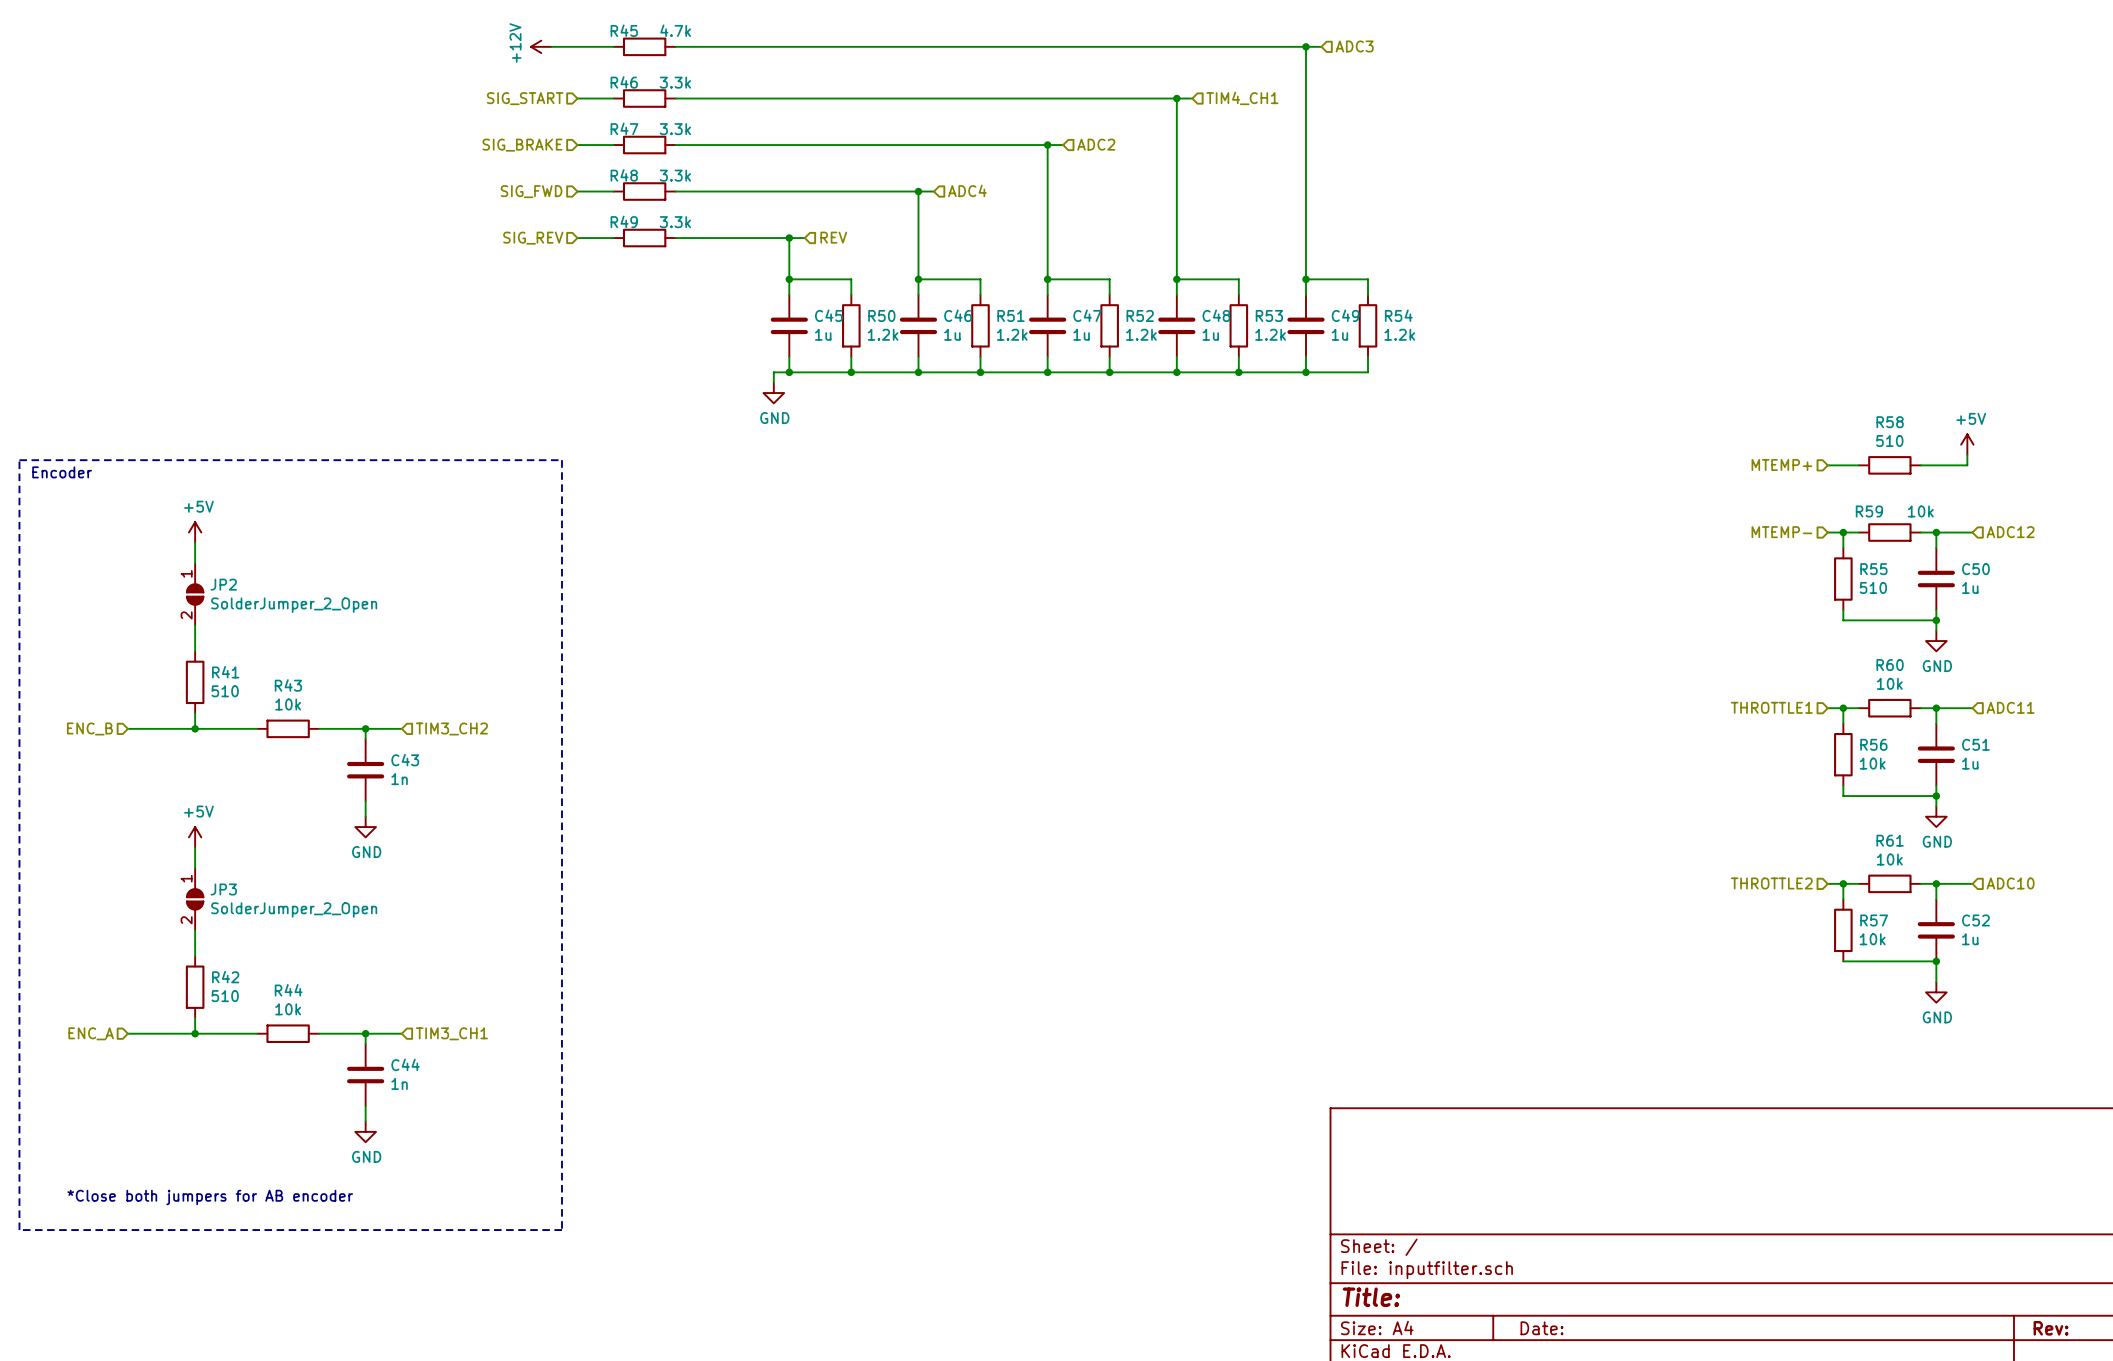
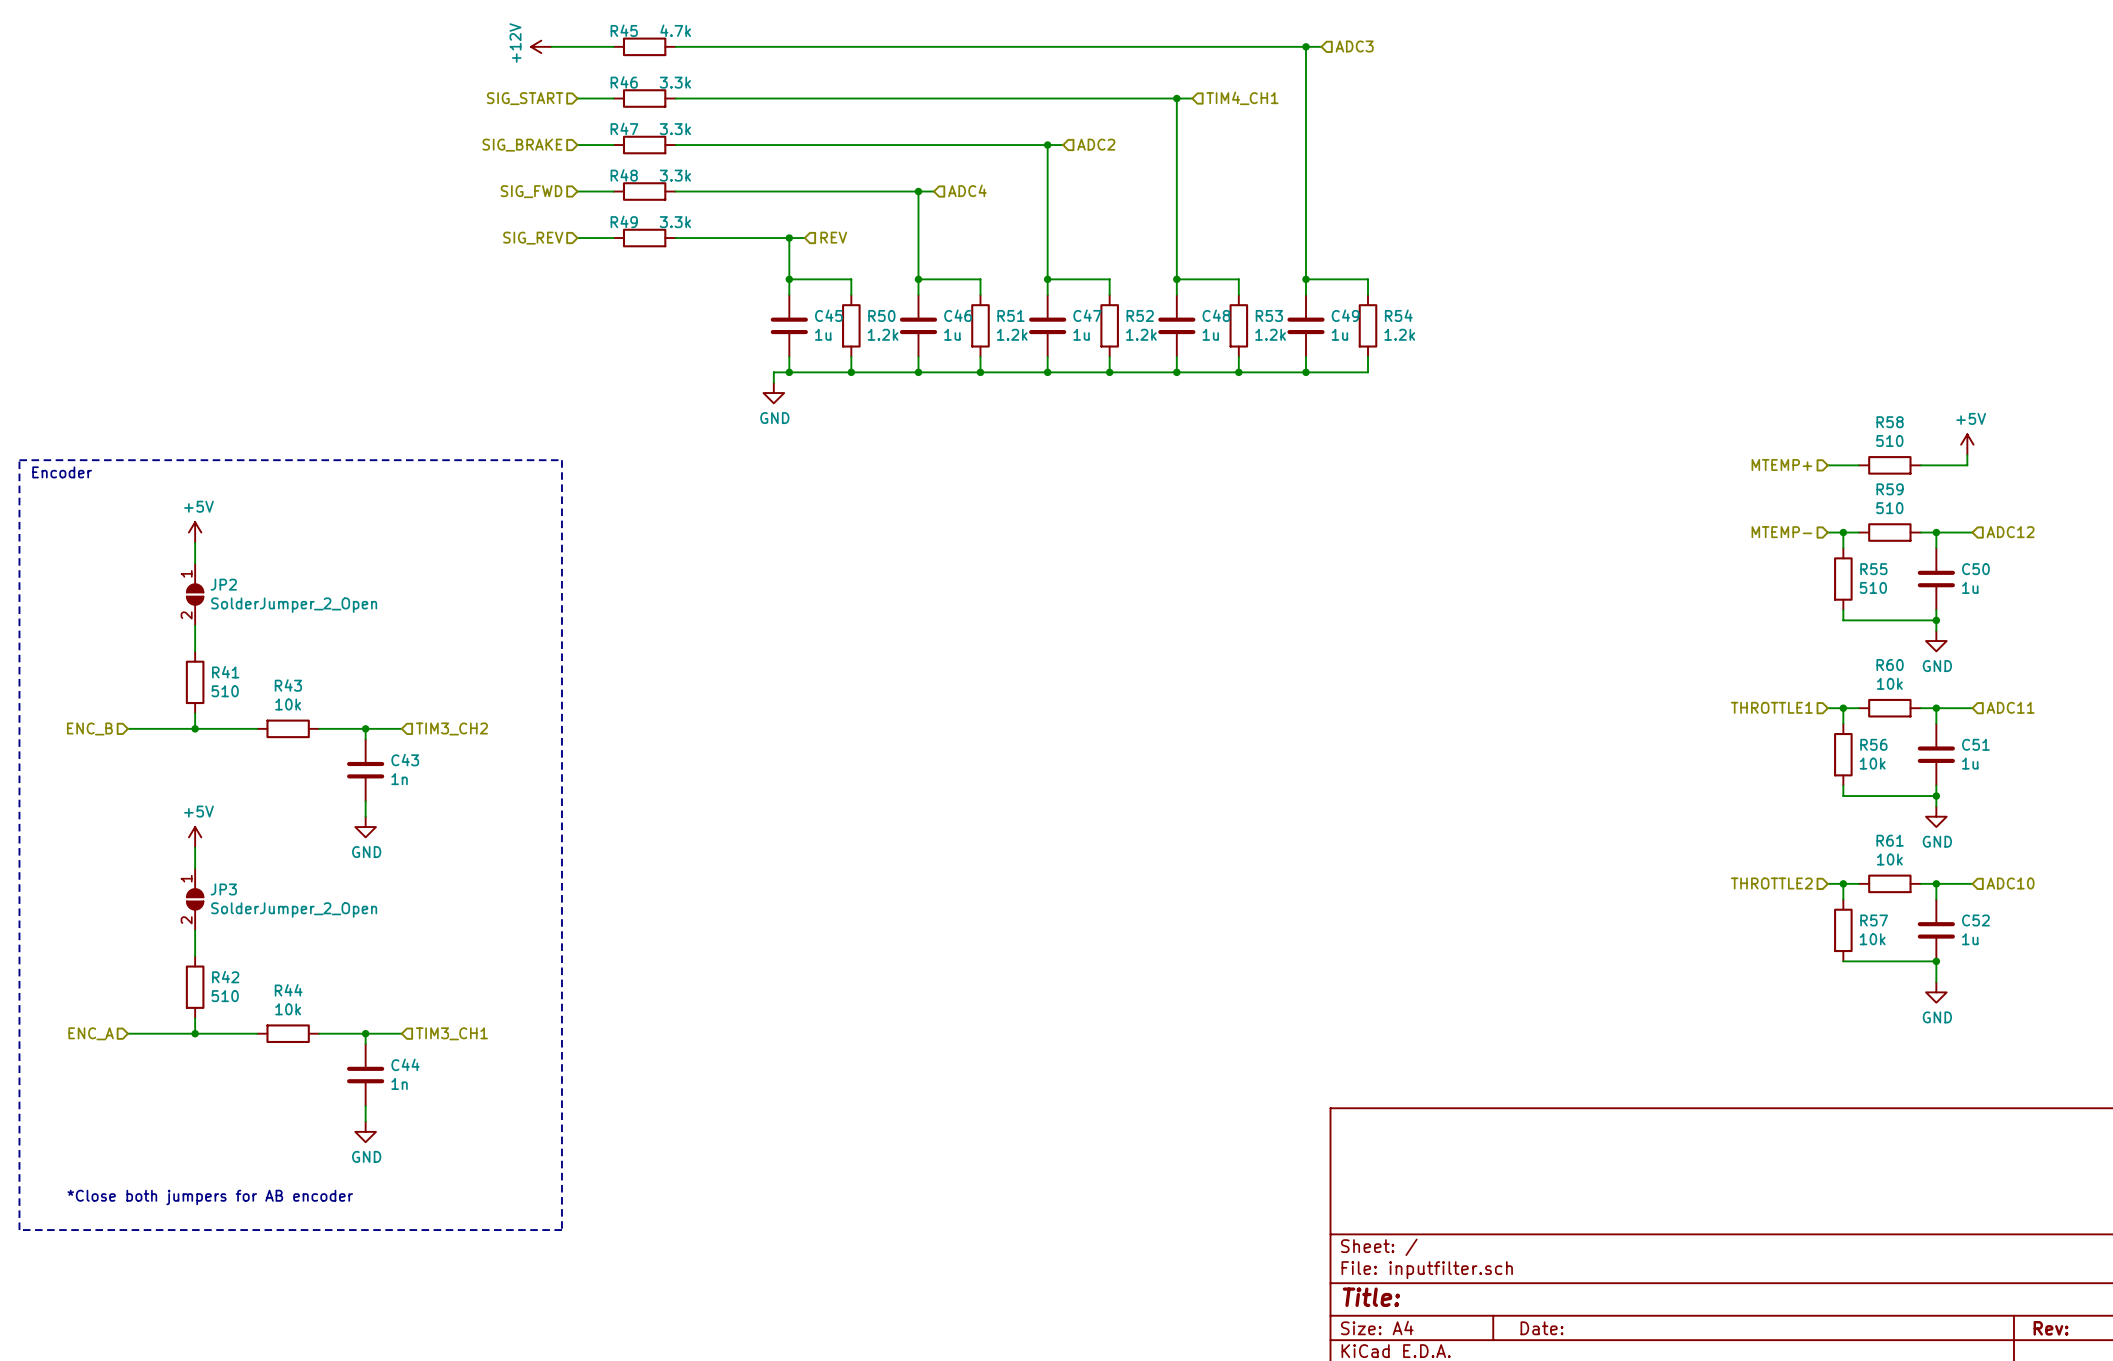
R59 name position: R59 (1869, 511) -> R59 (1890, 489)
R59 value: 10k (1920, 511) -> 510 (1889, 508)

